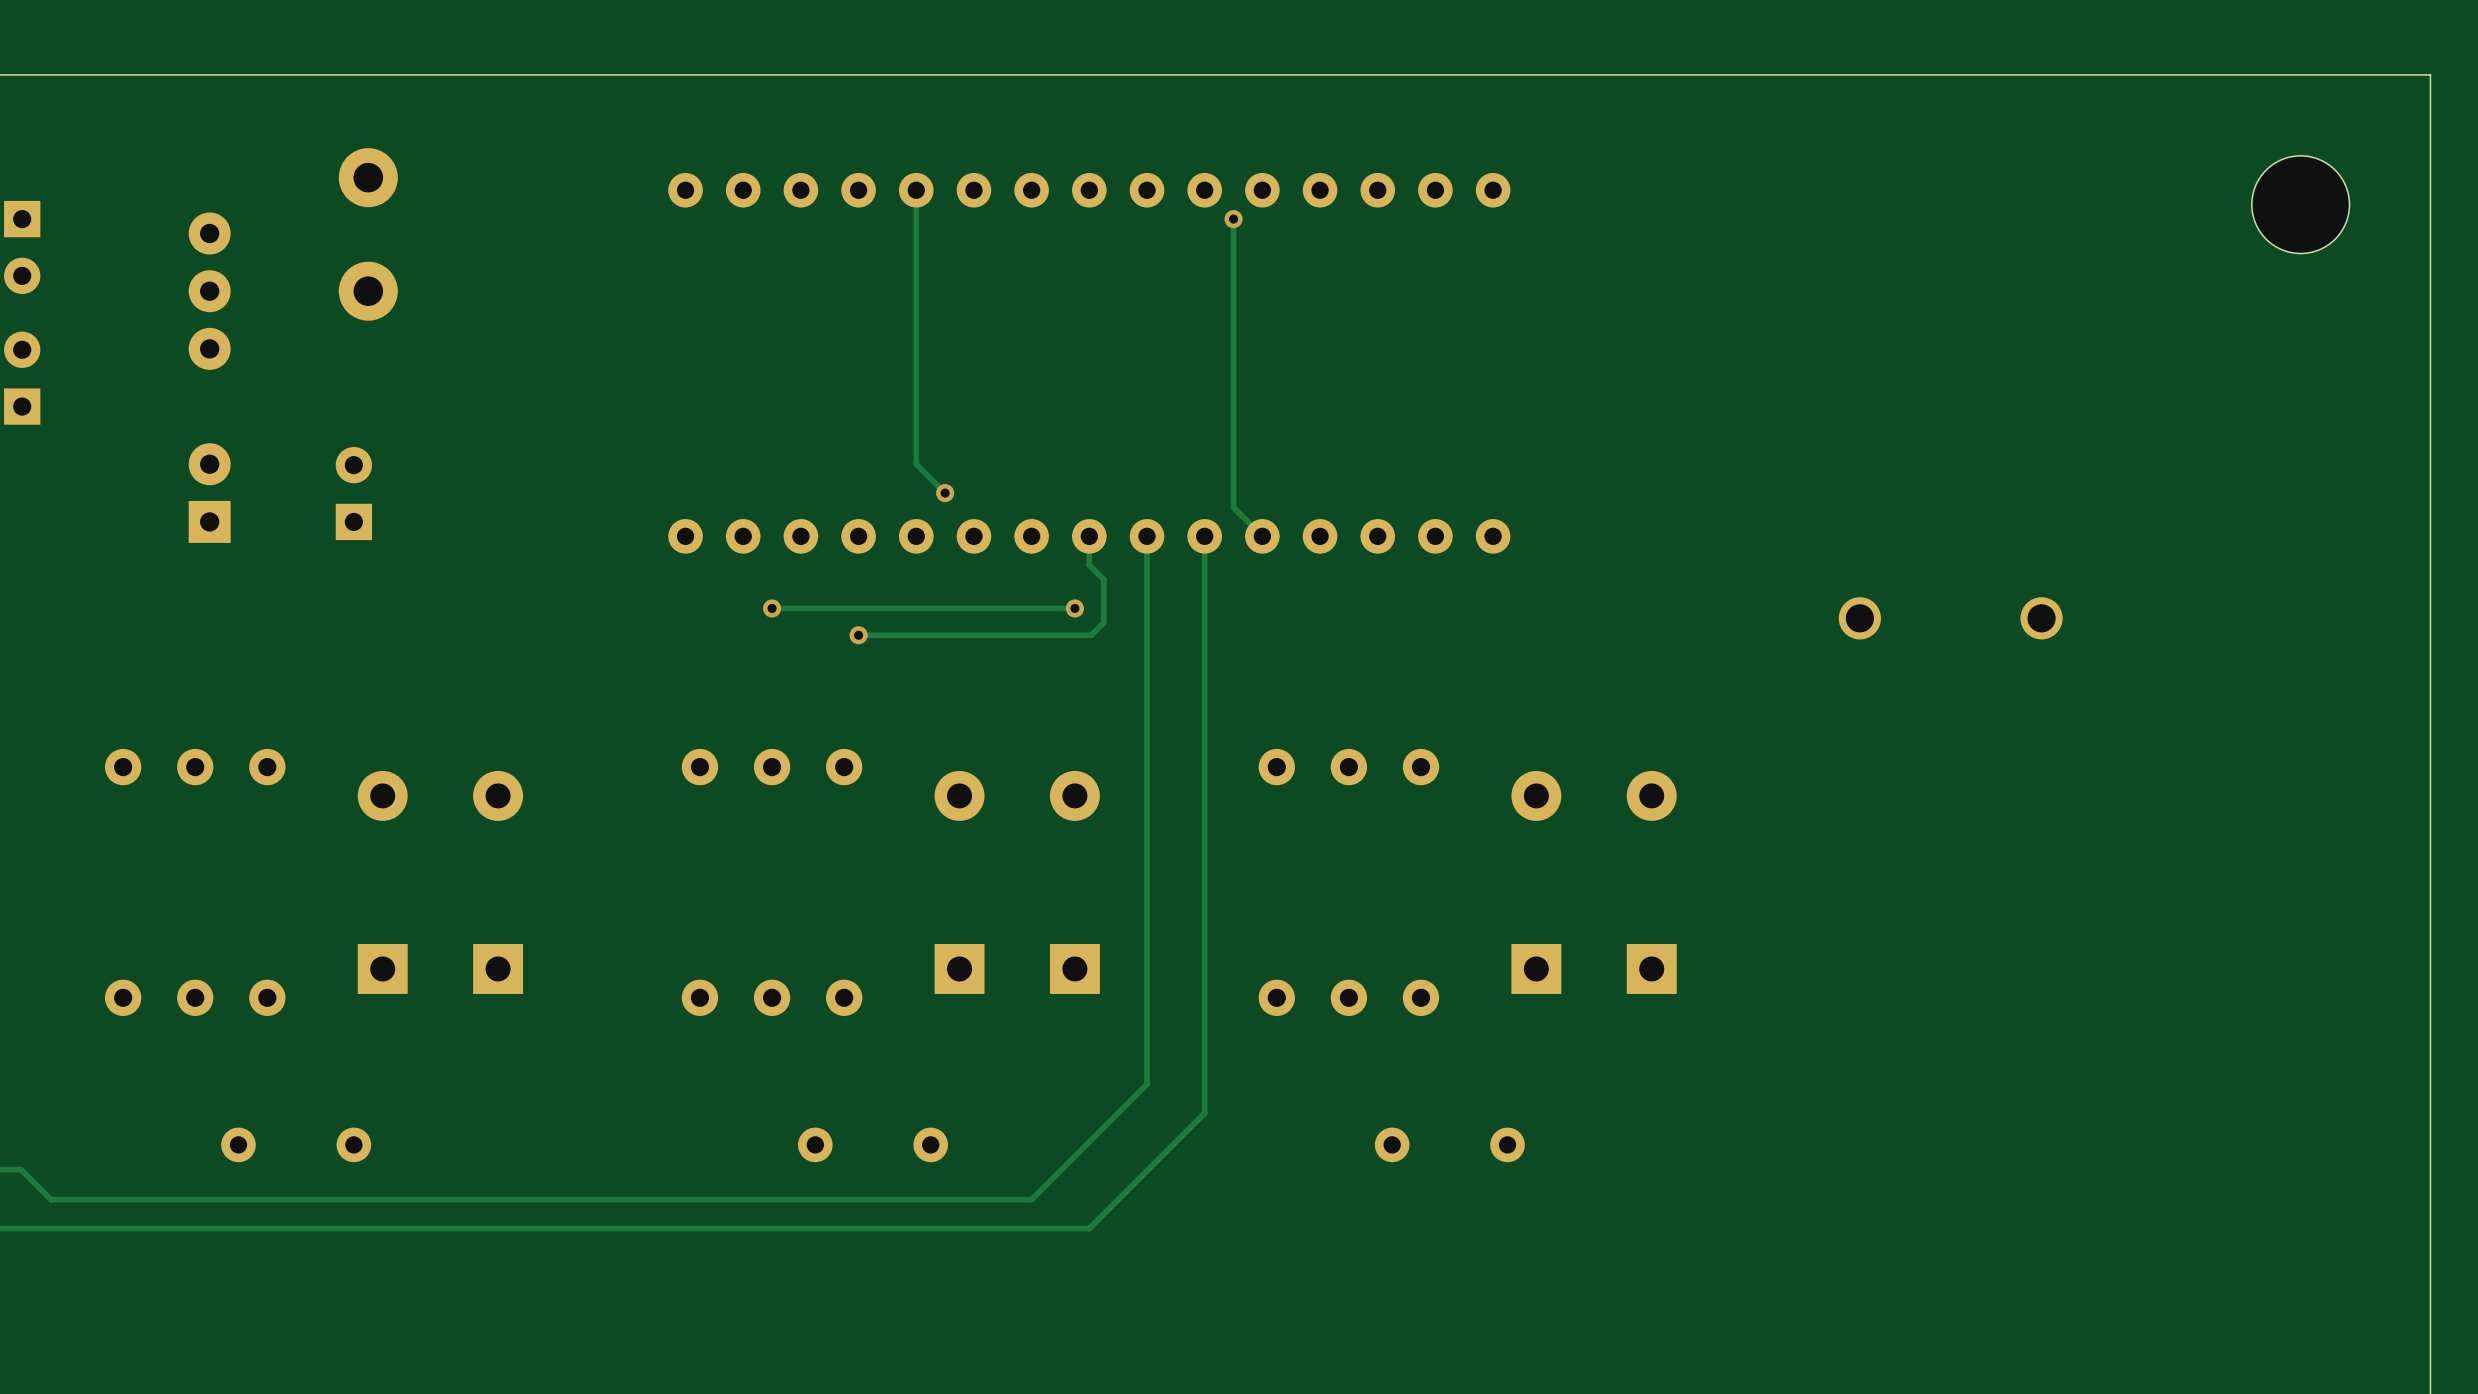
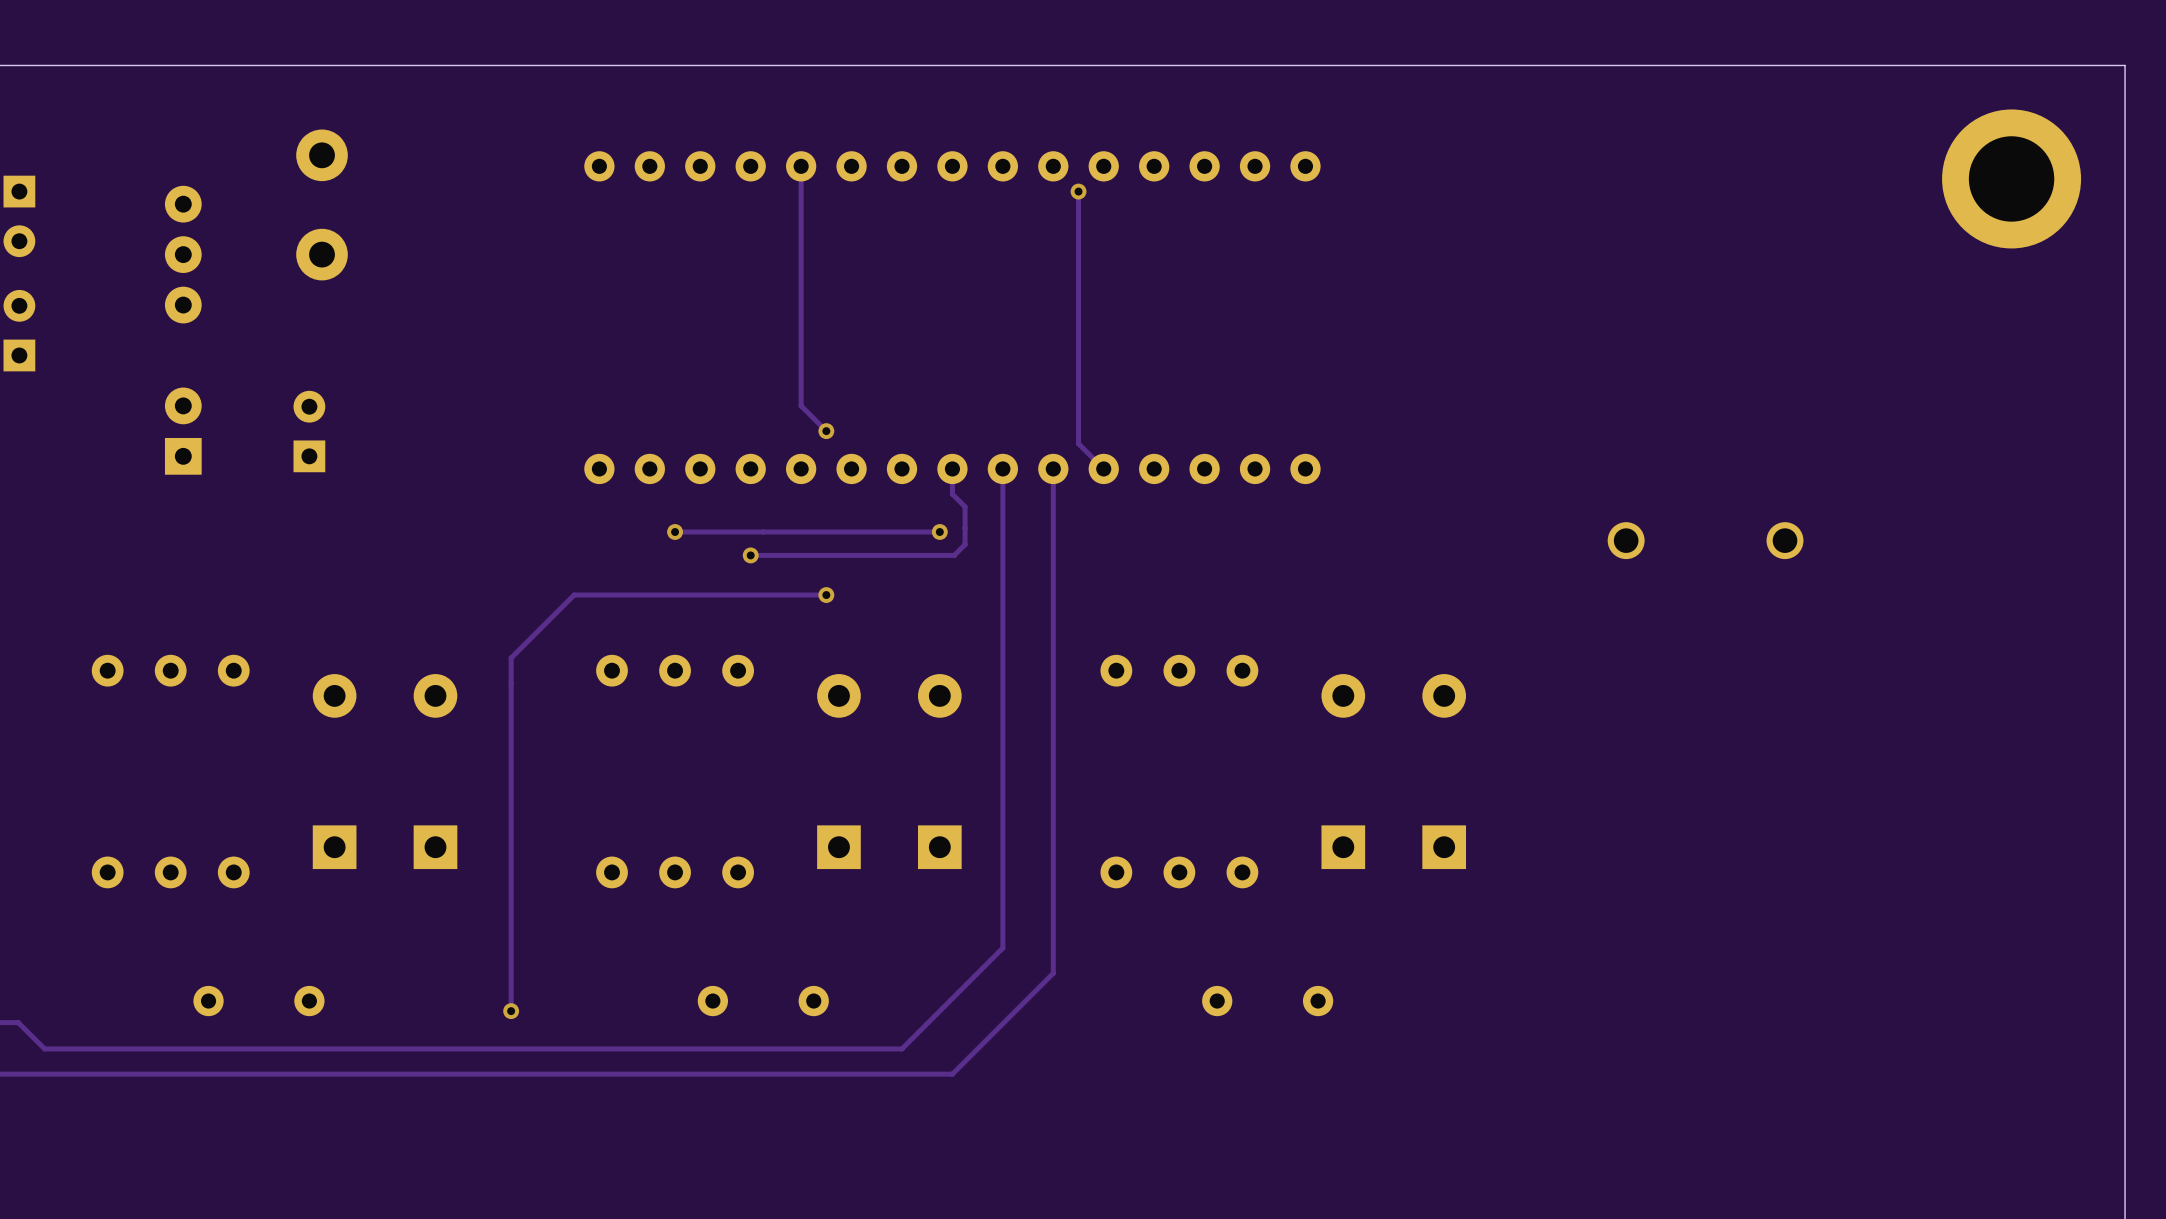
part footprint: [2251, 155, 2350, 254] -> [1942, 109, 2082, 249]
track: none -> (826, 595) (574, 595) (511, 658) (511, 1011)
via: none -> (826, 595)
via: none -> (511, 1011)

